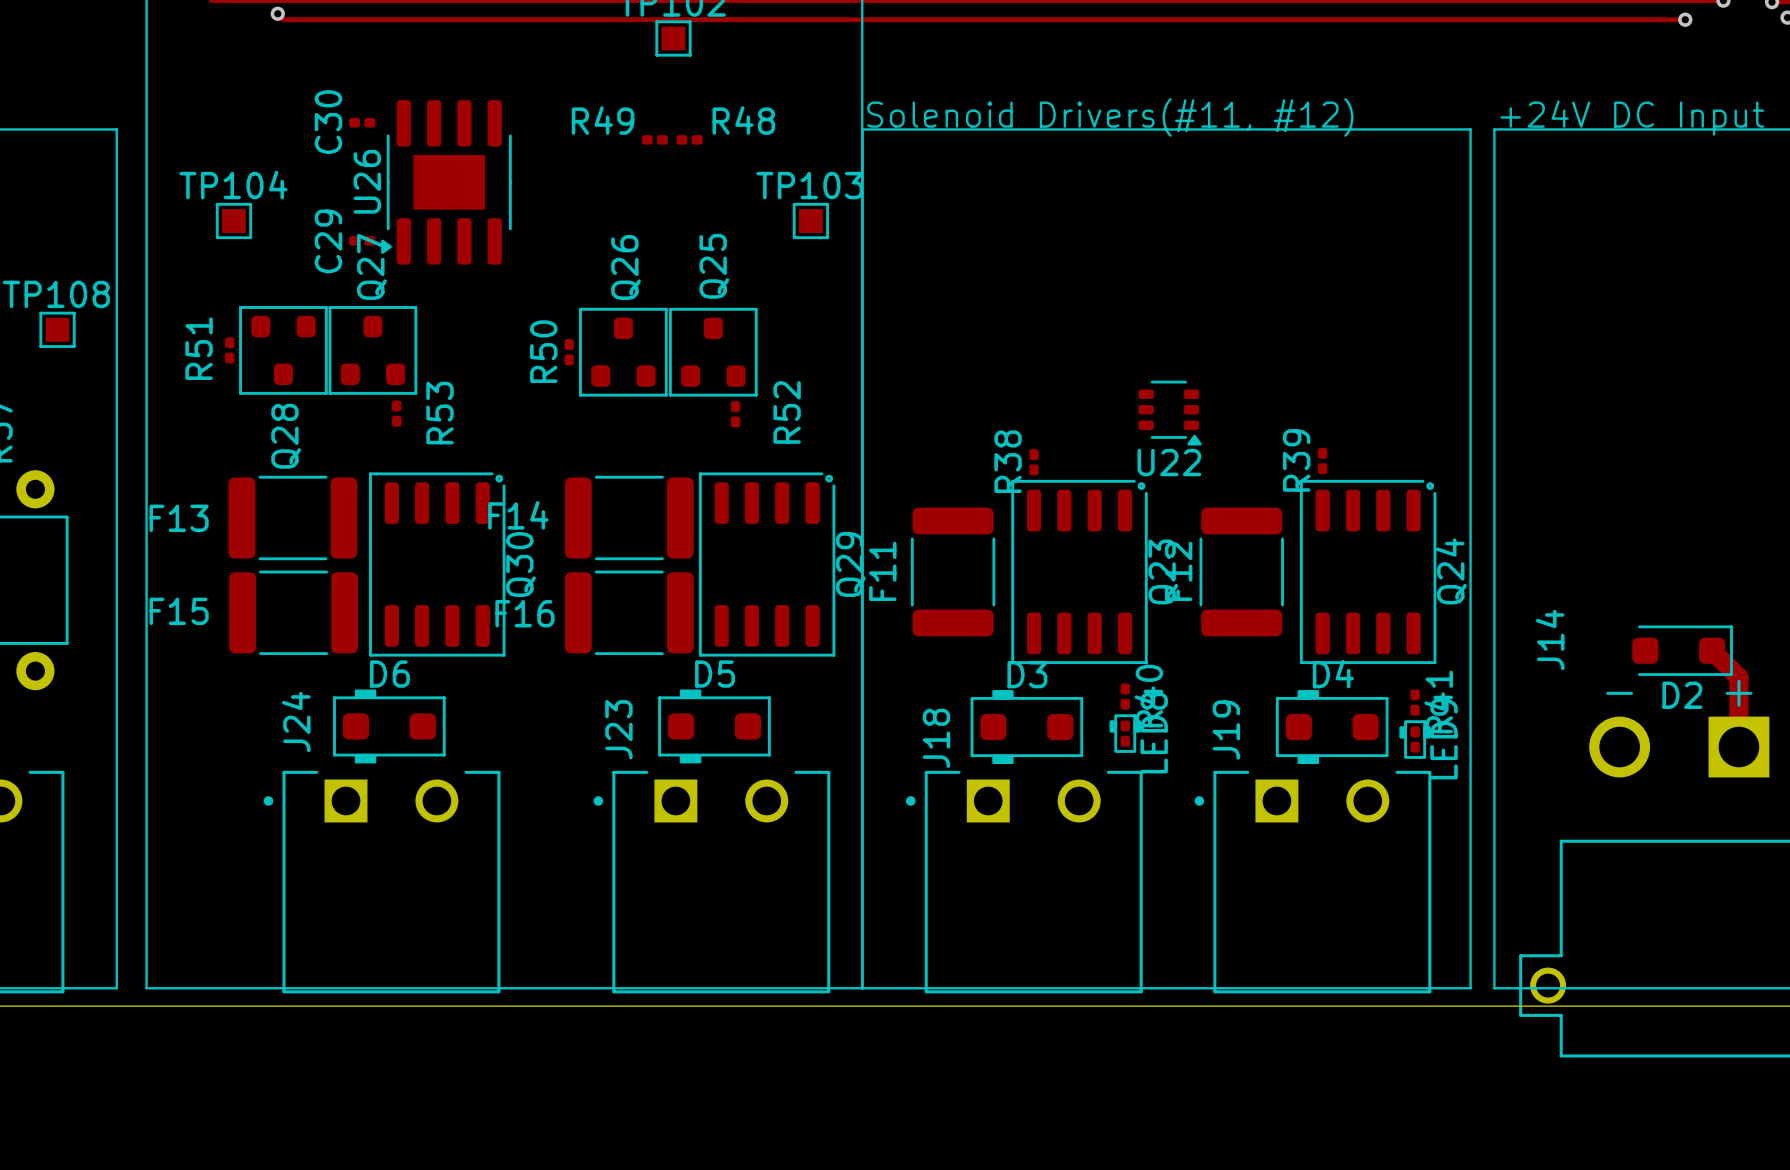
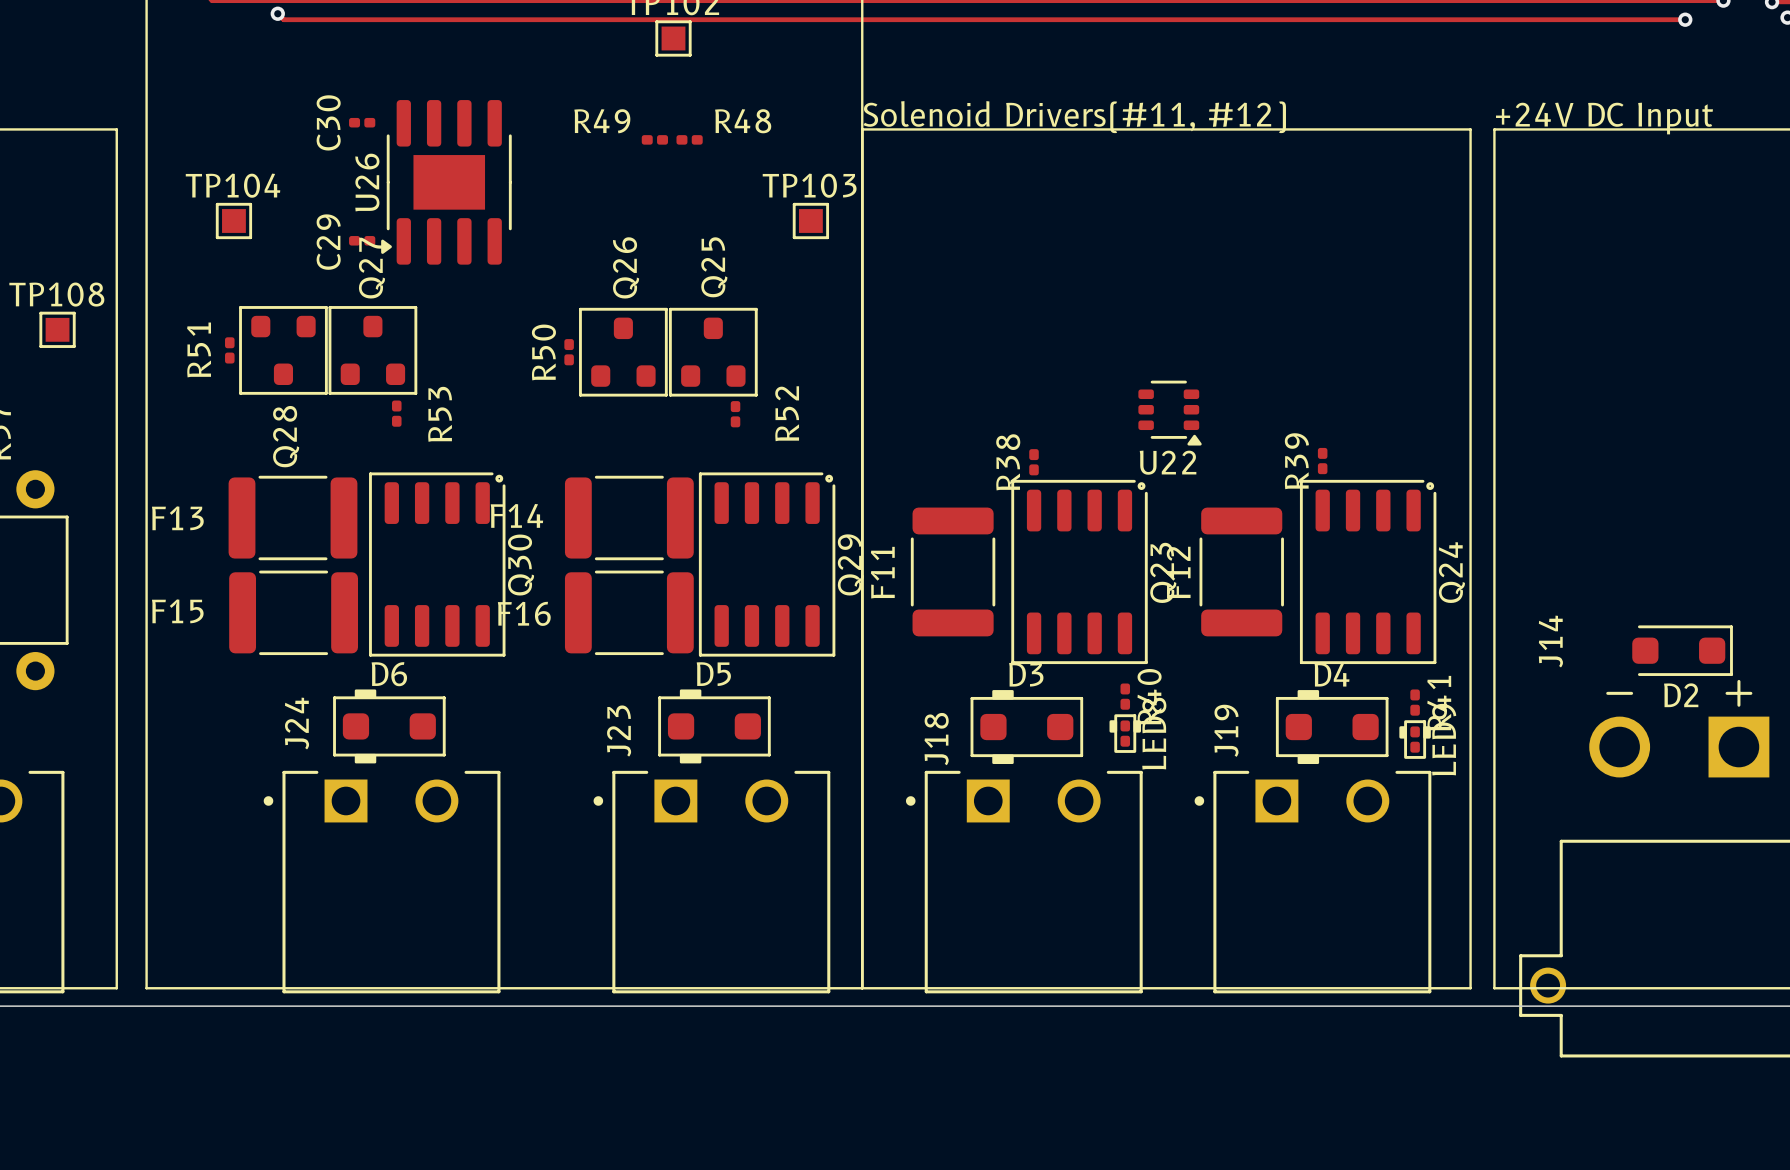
track: (1712, 650) (1738, 677) (1738, 747) -> none

